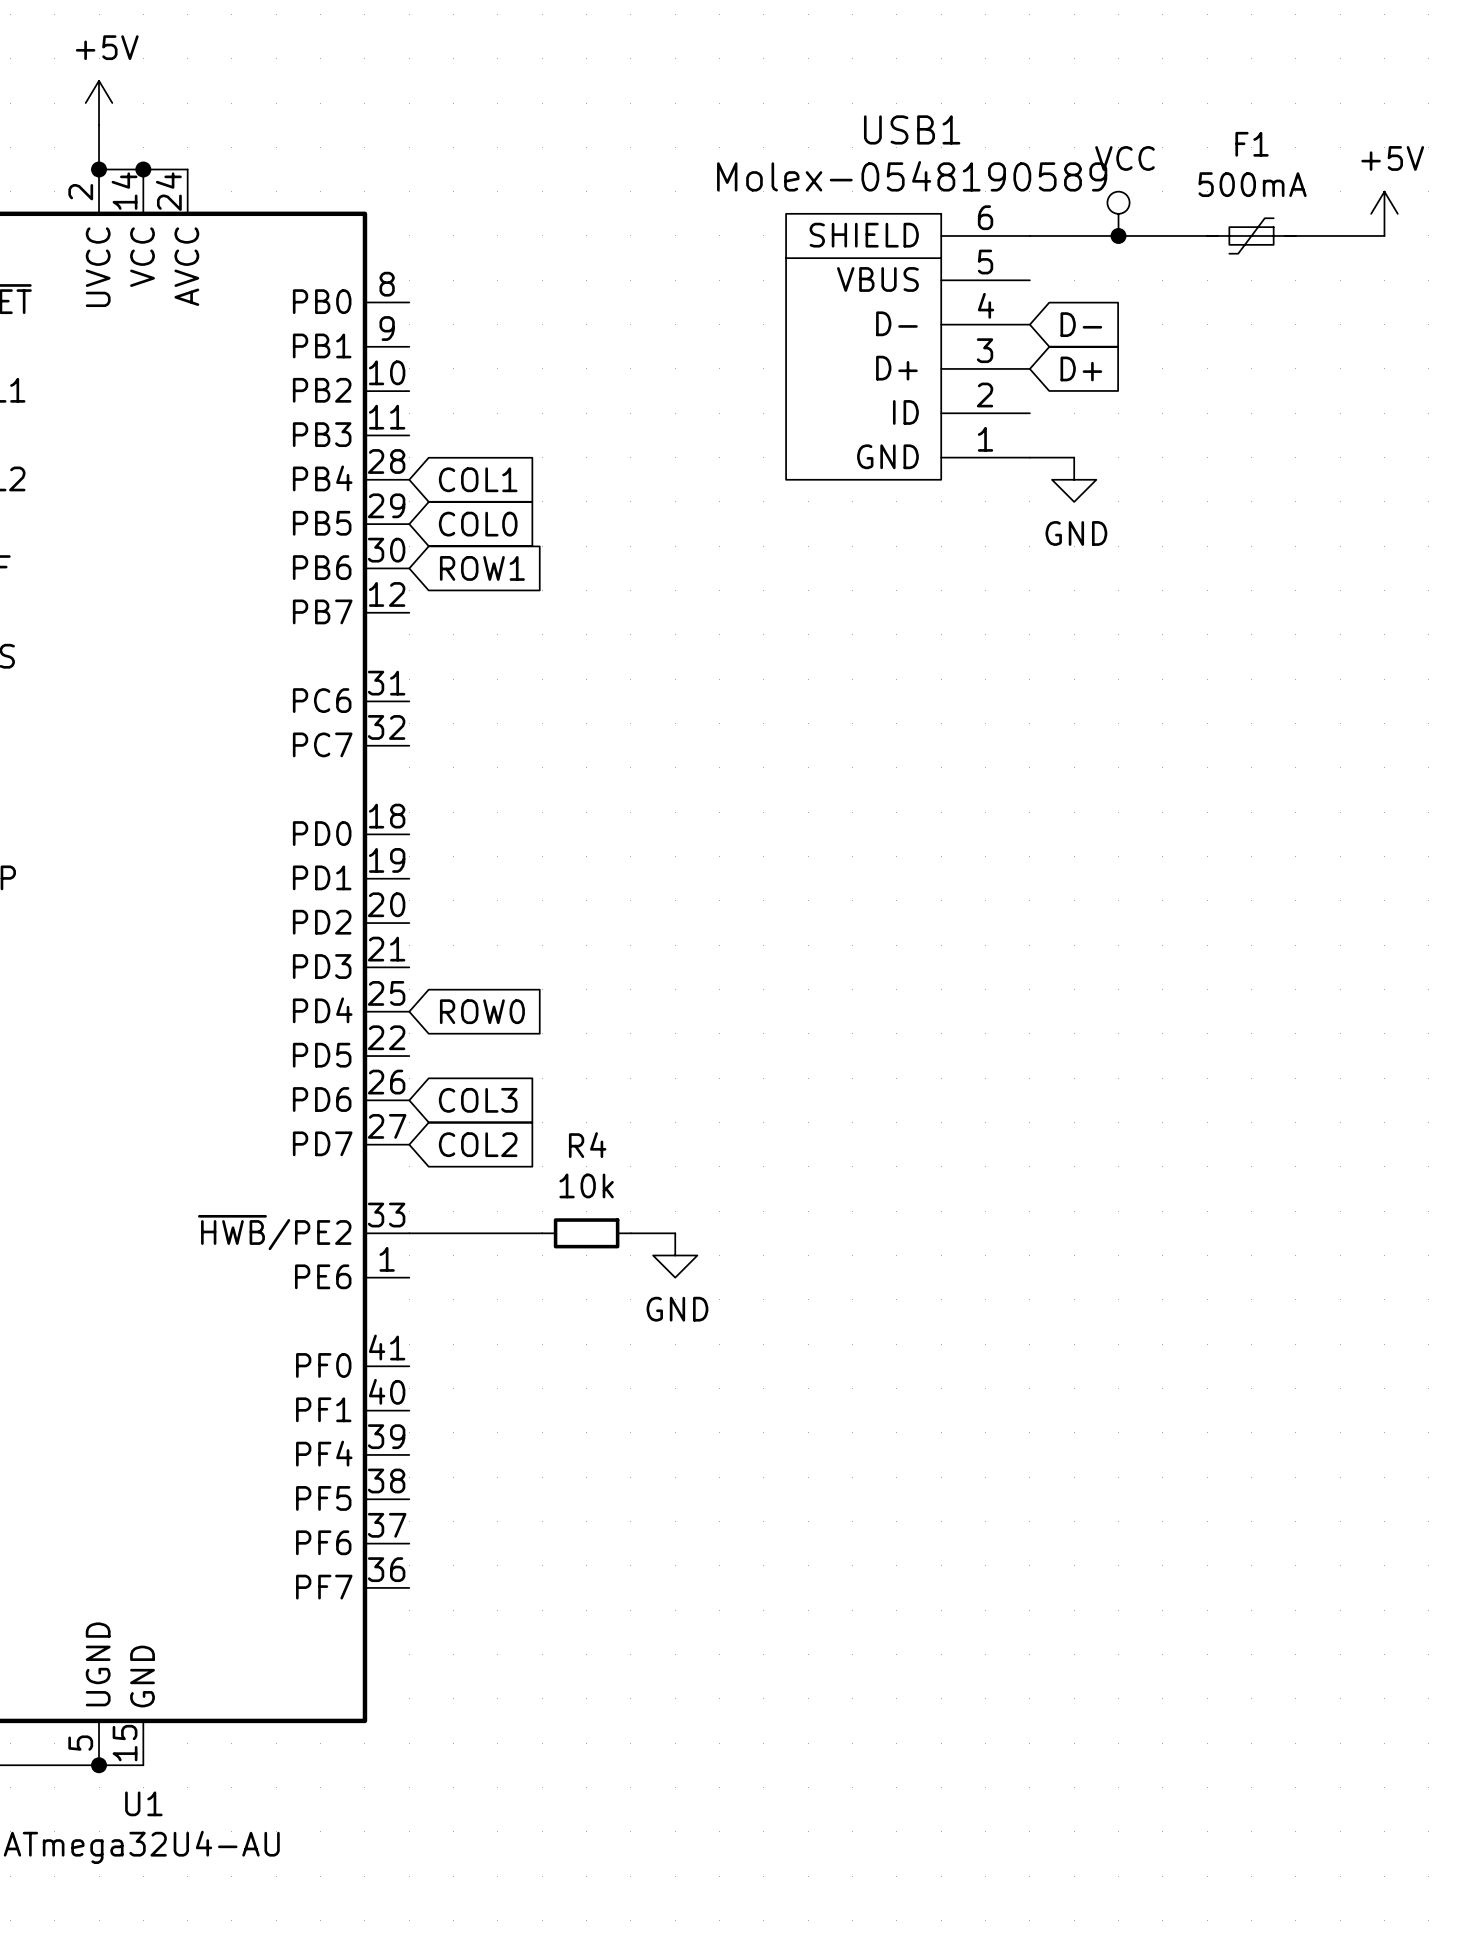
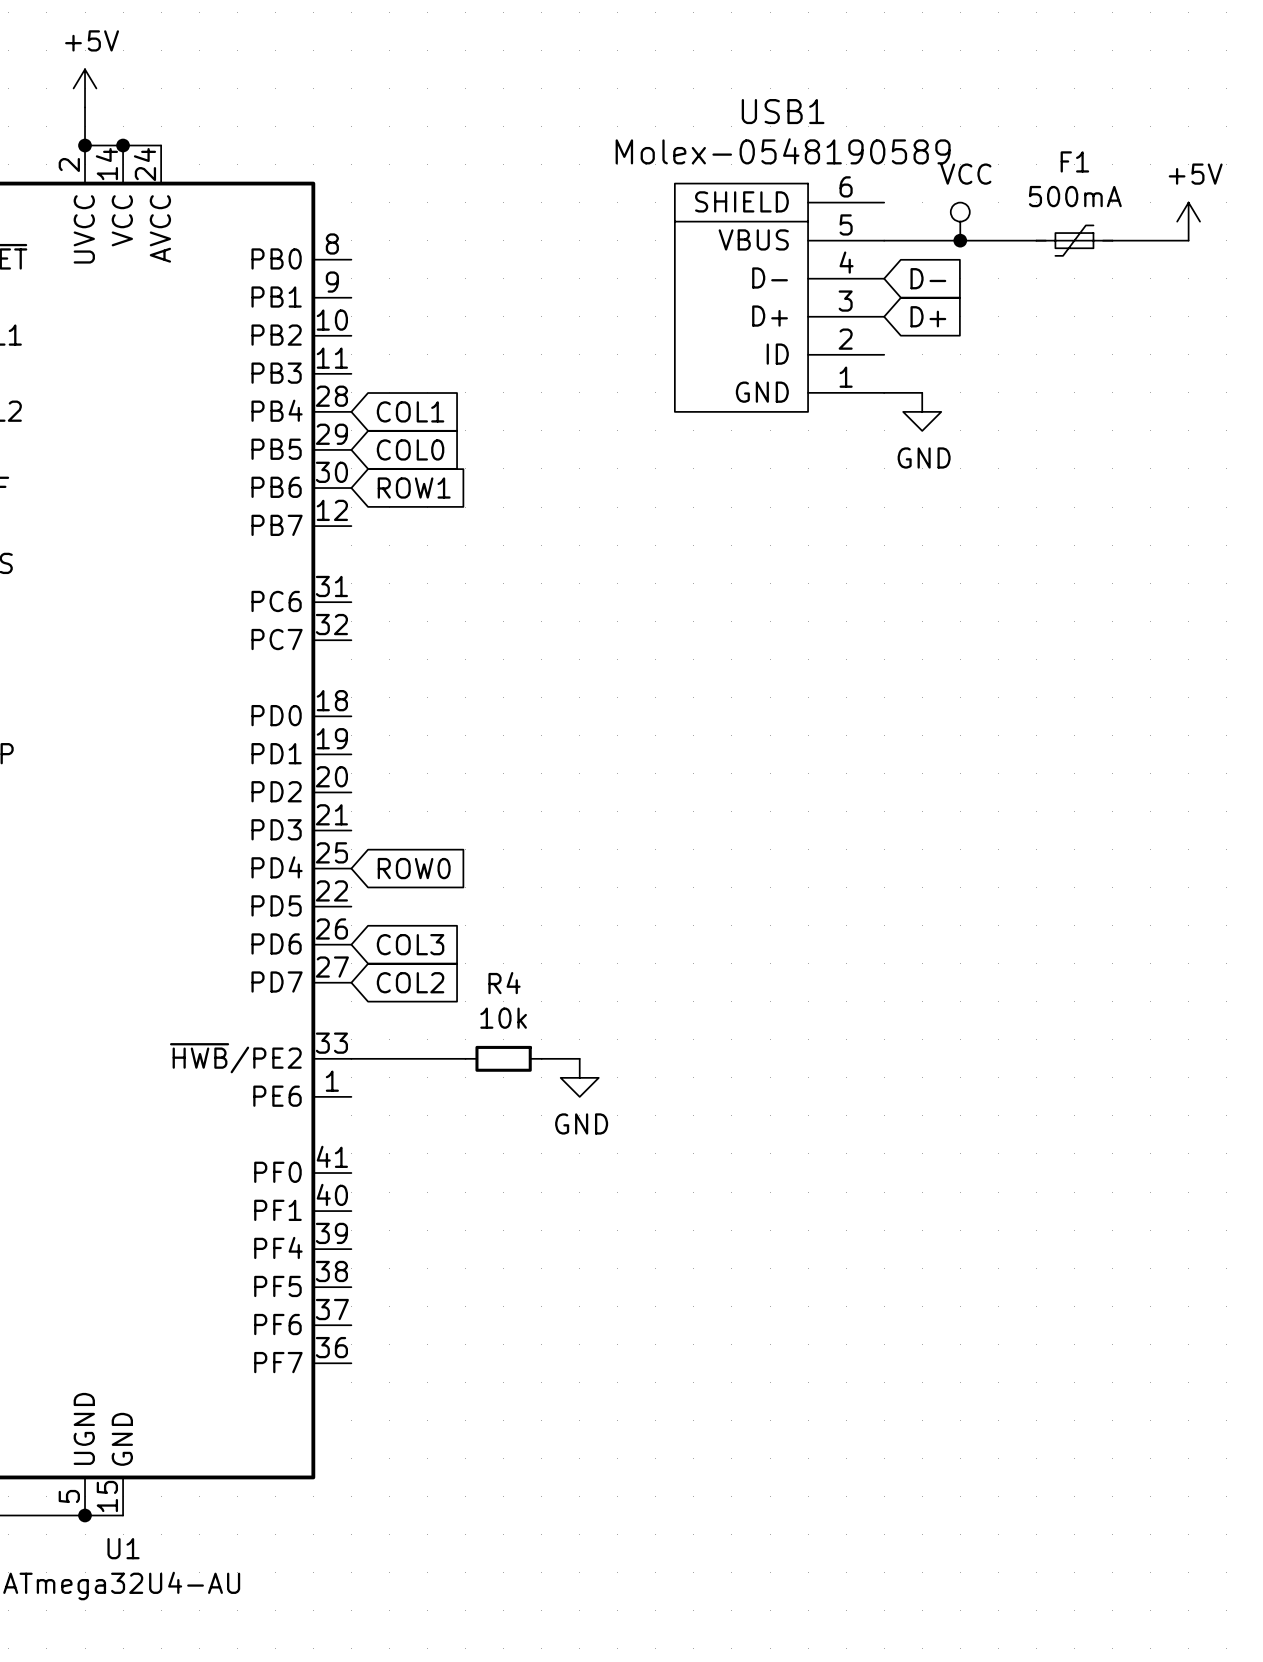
power symbol position: VCC (1118, 213) -> VCC (960, 221)
power symbol position: +5V (1384, 213) -> +5V (1188, 221)
wire: (1029, 235) (1207, 235) -> (884, 240) (1036, 240)
junction position: (1118, 235) -> (960, 240)
F1 position: (1251, 235) -> (1074, 240)
wire: (1295, 235) (1384, 235) -> (1112, 240) (1188, 240)

